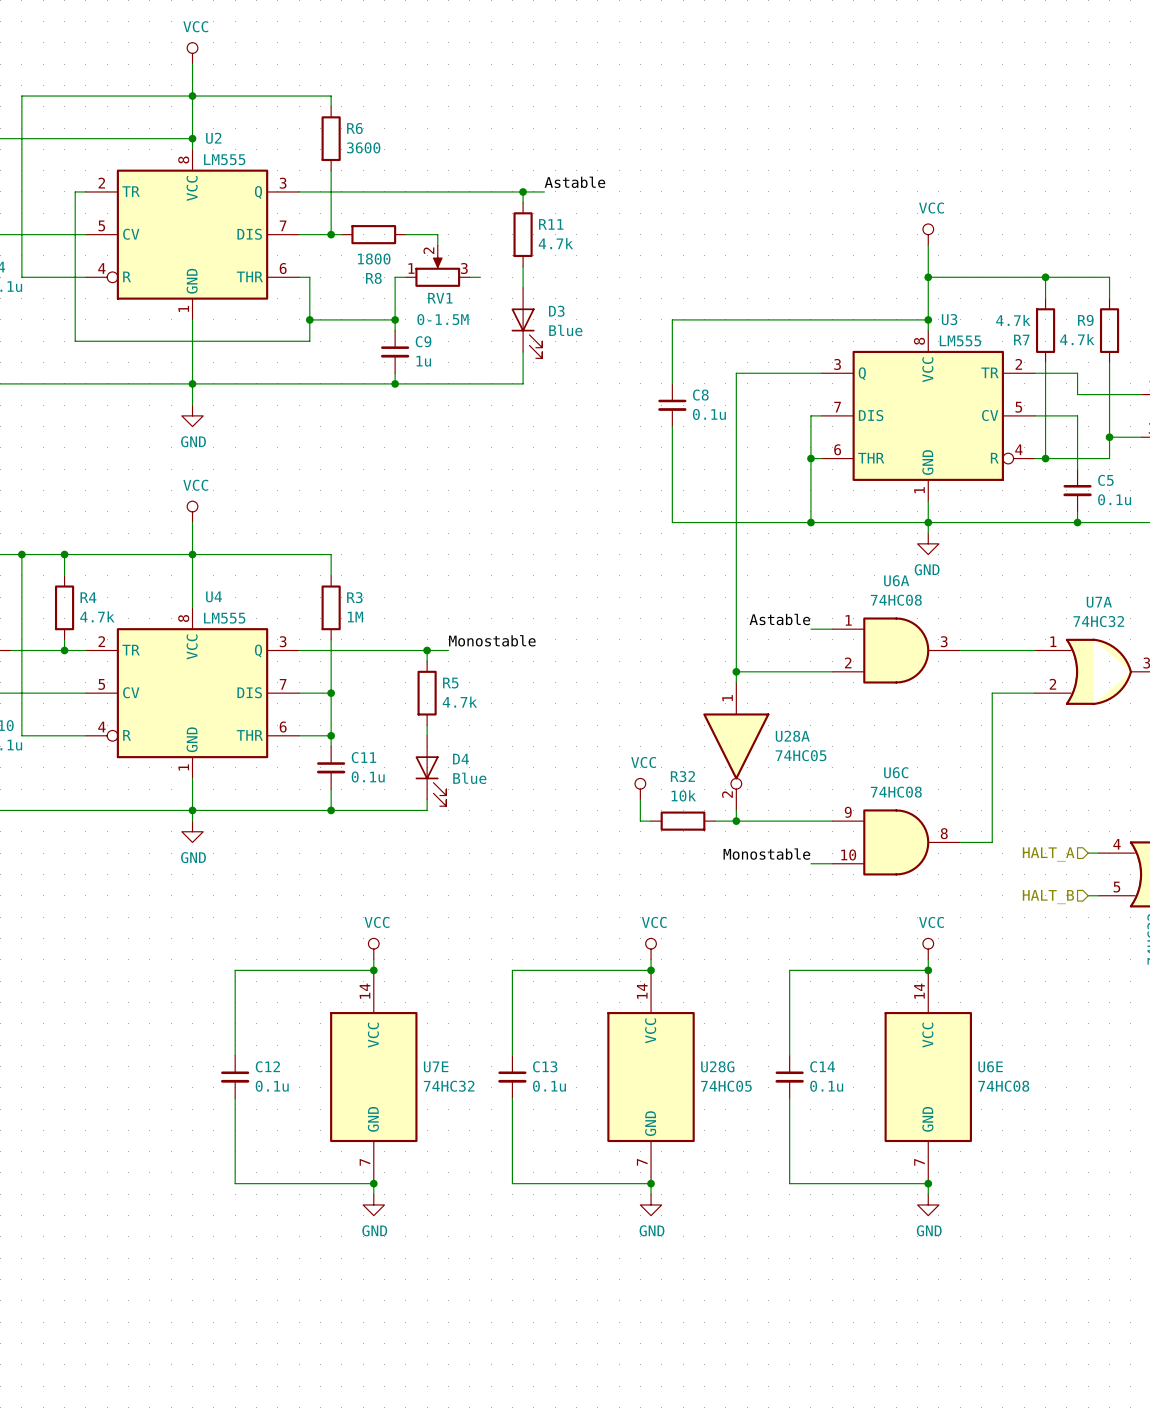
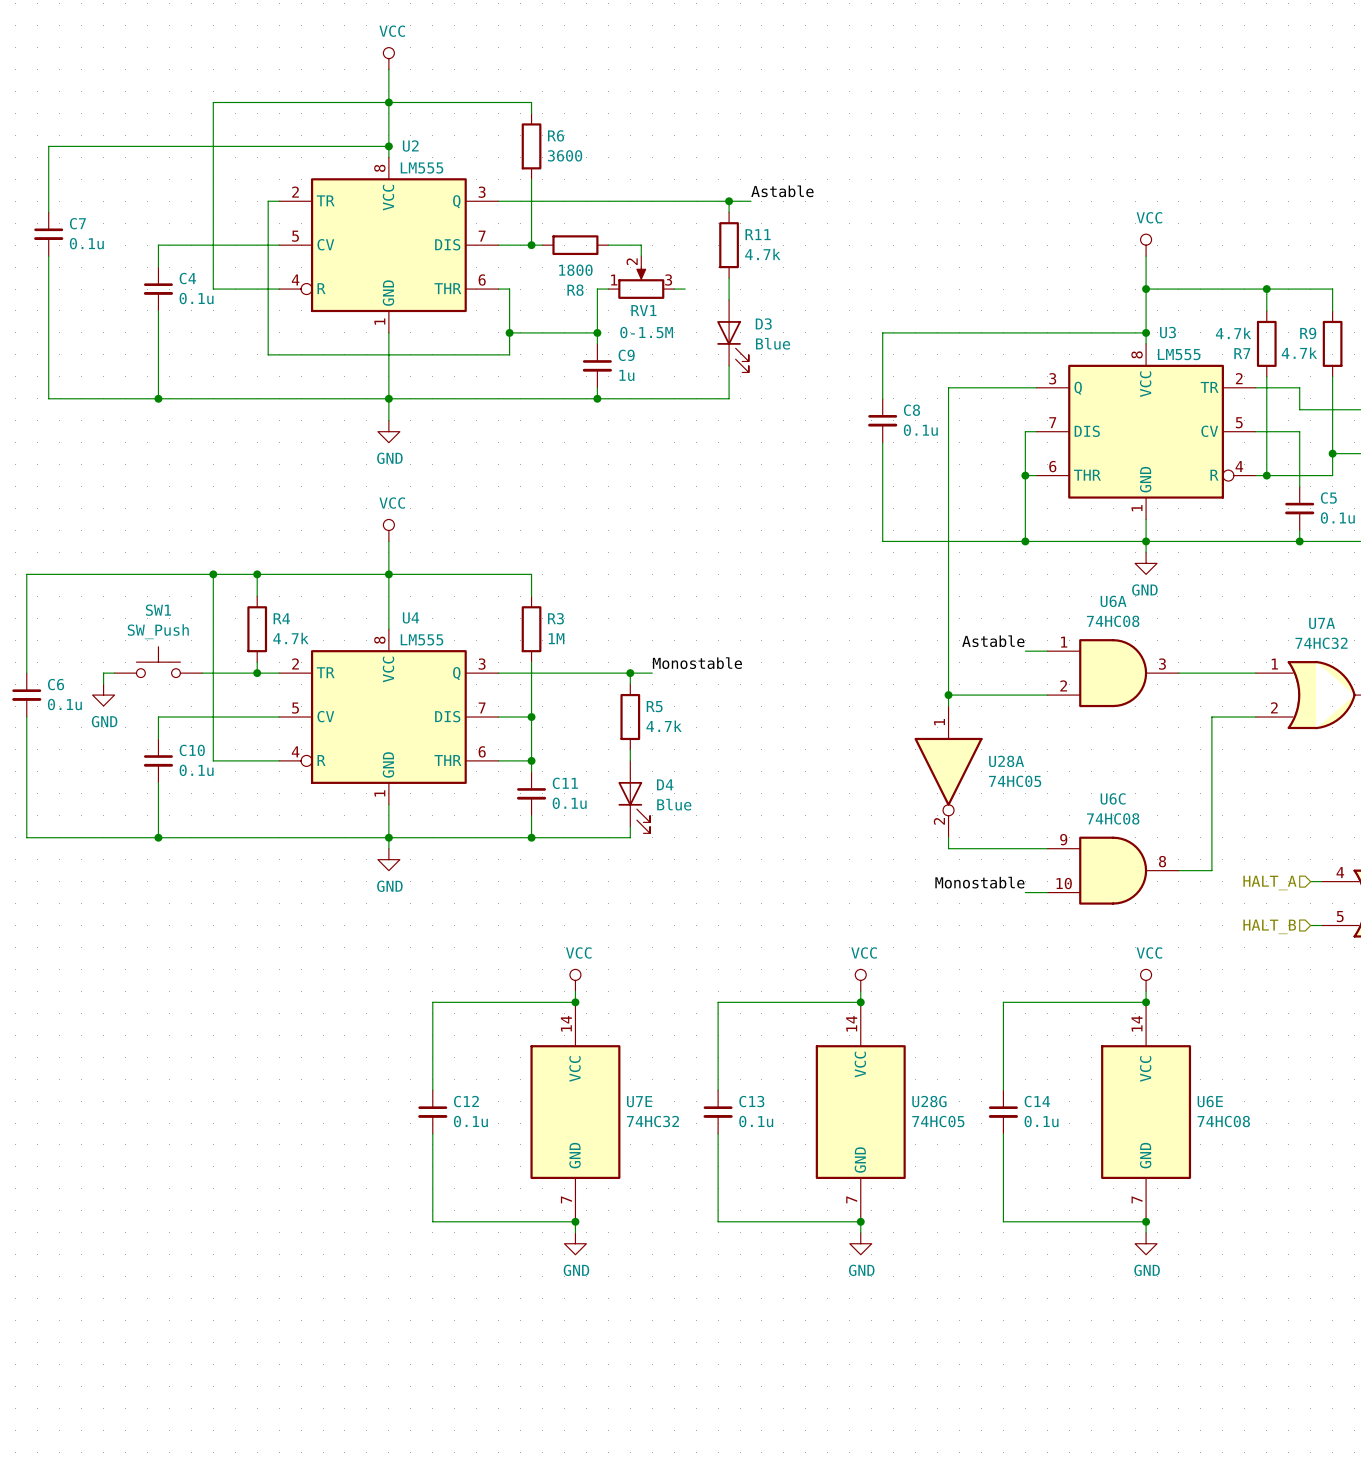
power symbol: VCC (640, 789) -> none
wire: (640, 799) (640, 821) (651, 821) -> none
R32: 10k (683, 821) -> none
wire: (715, 821) (736, 821) -> none
junction: (736, 821) -> none

